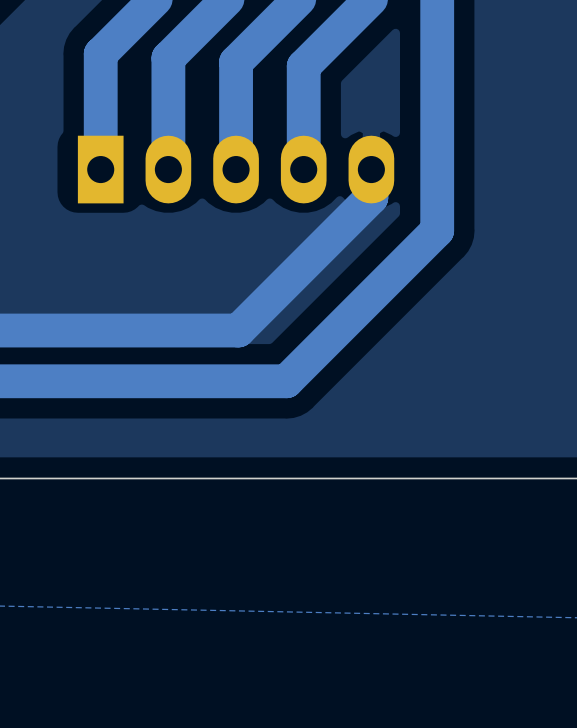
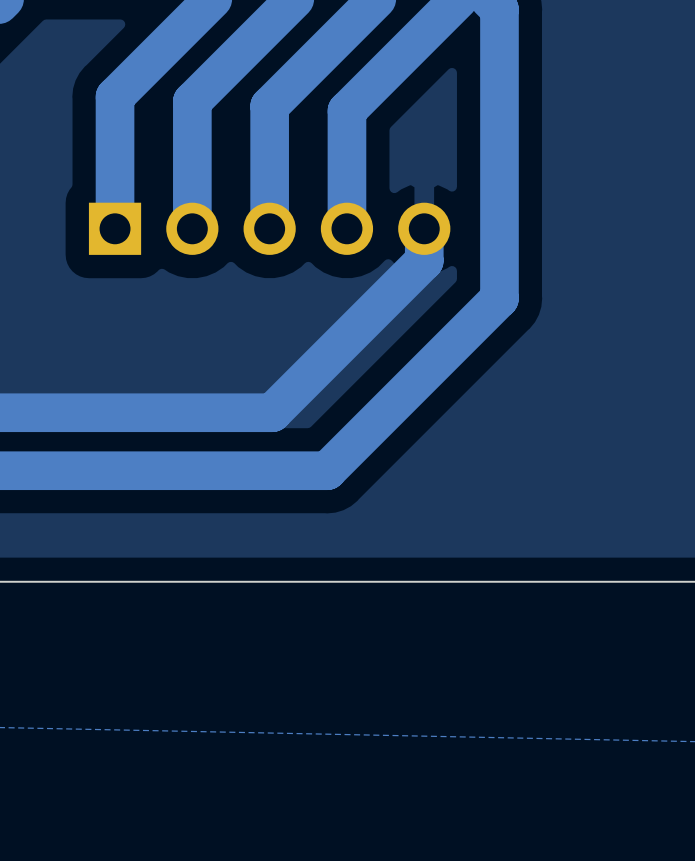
part footprint: [77, 135, 395, 204] -> [88, 202, 451, 255]

